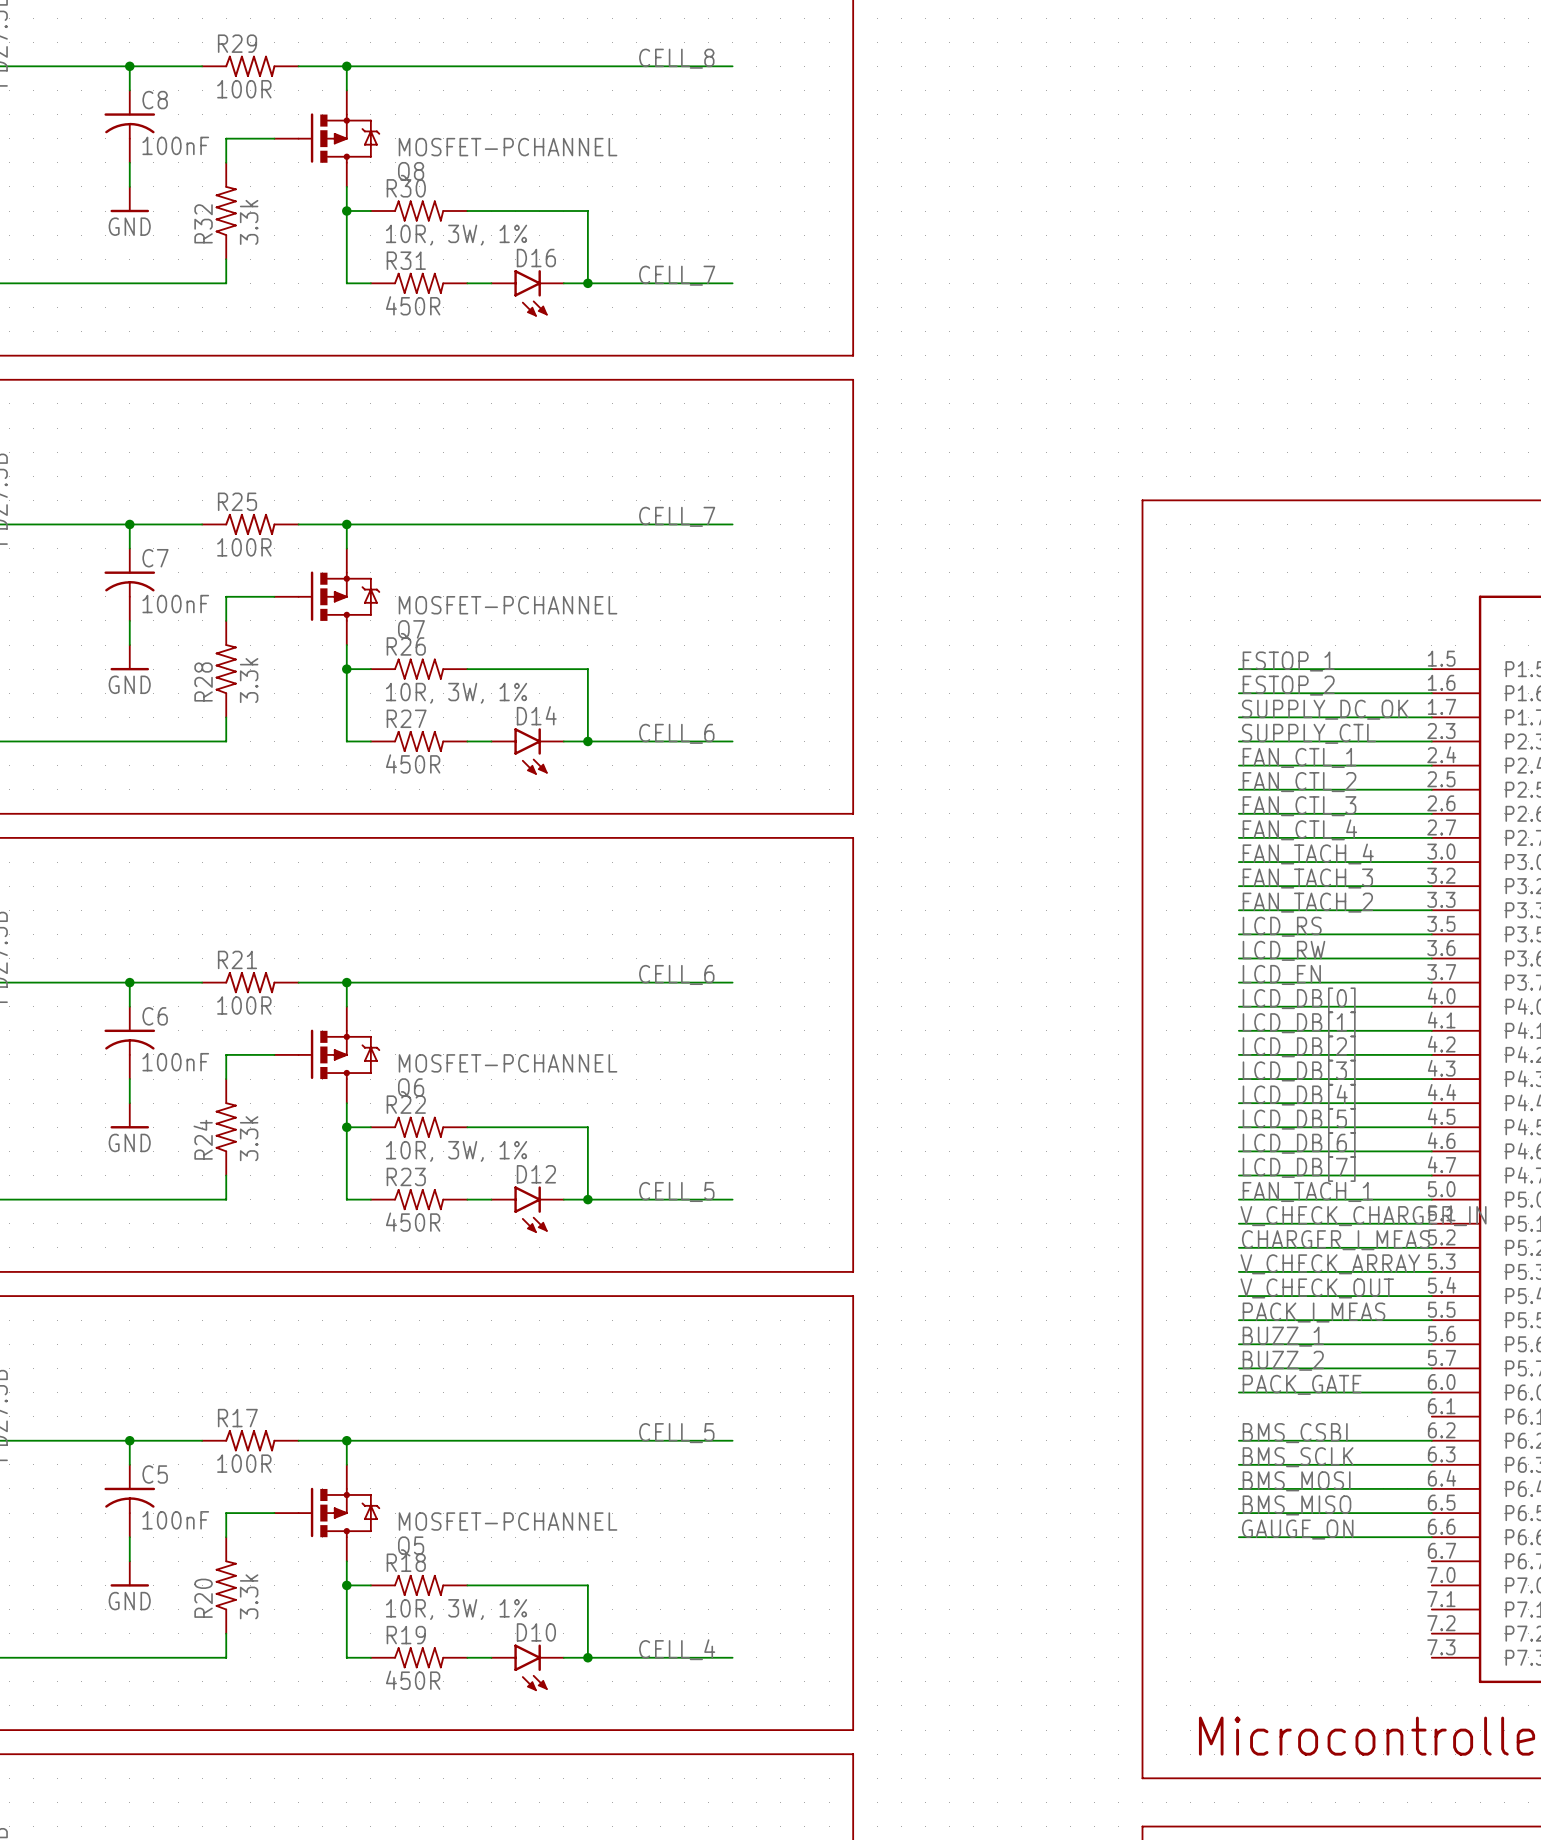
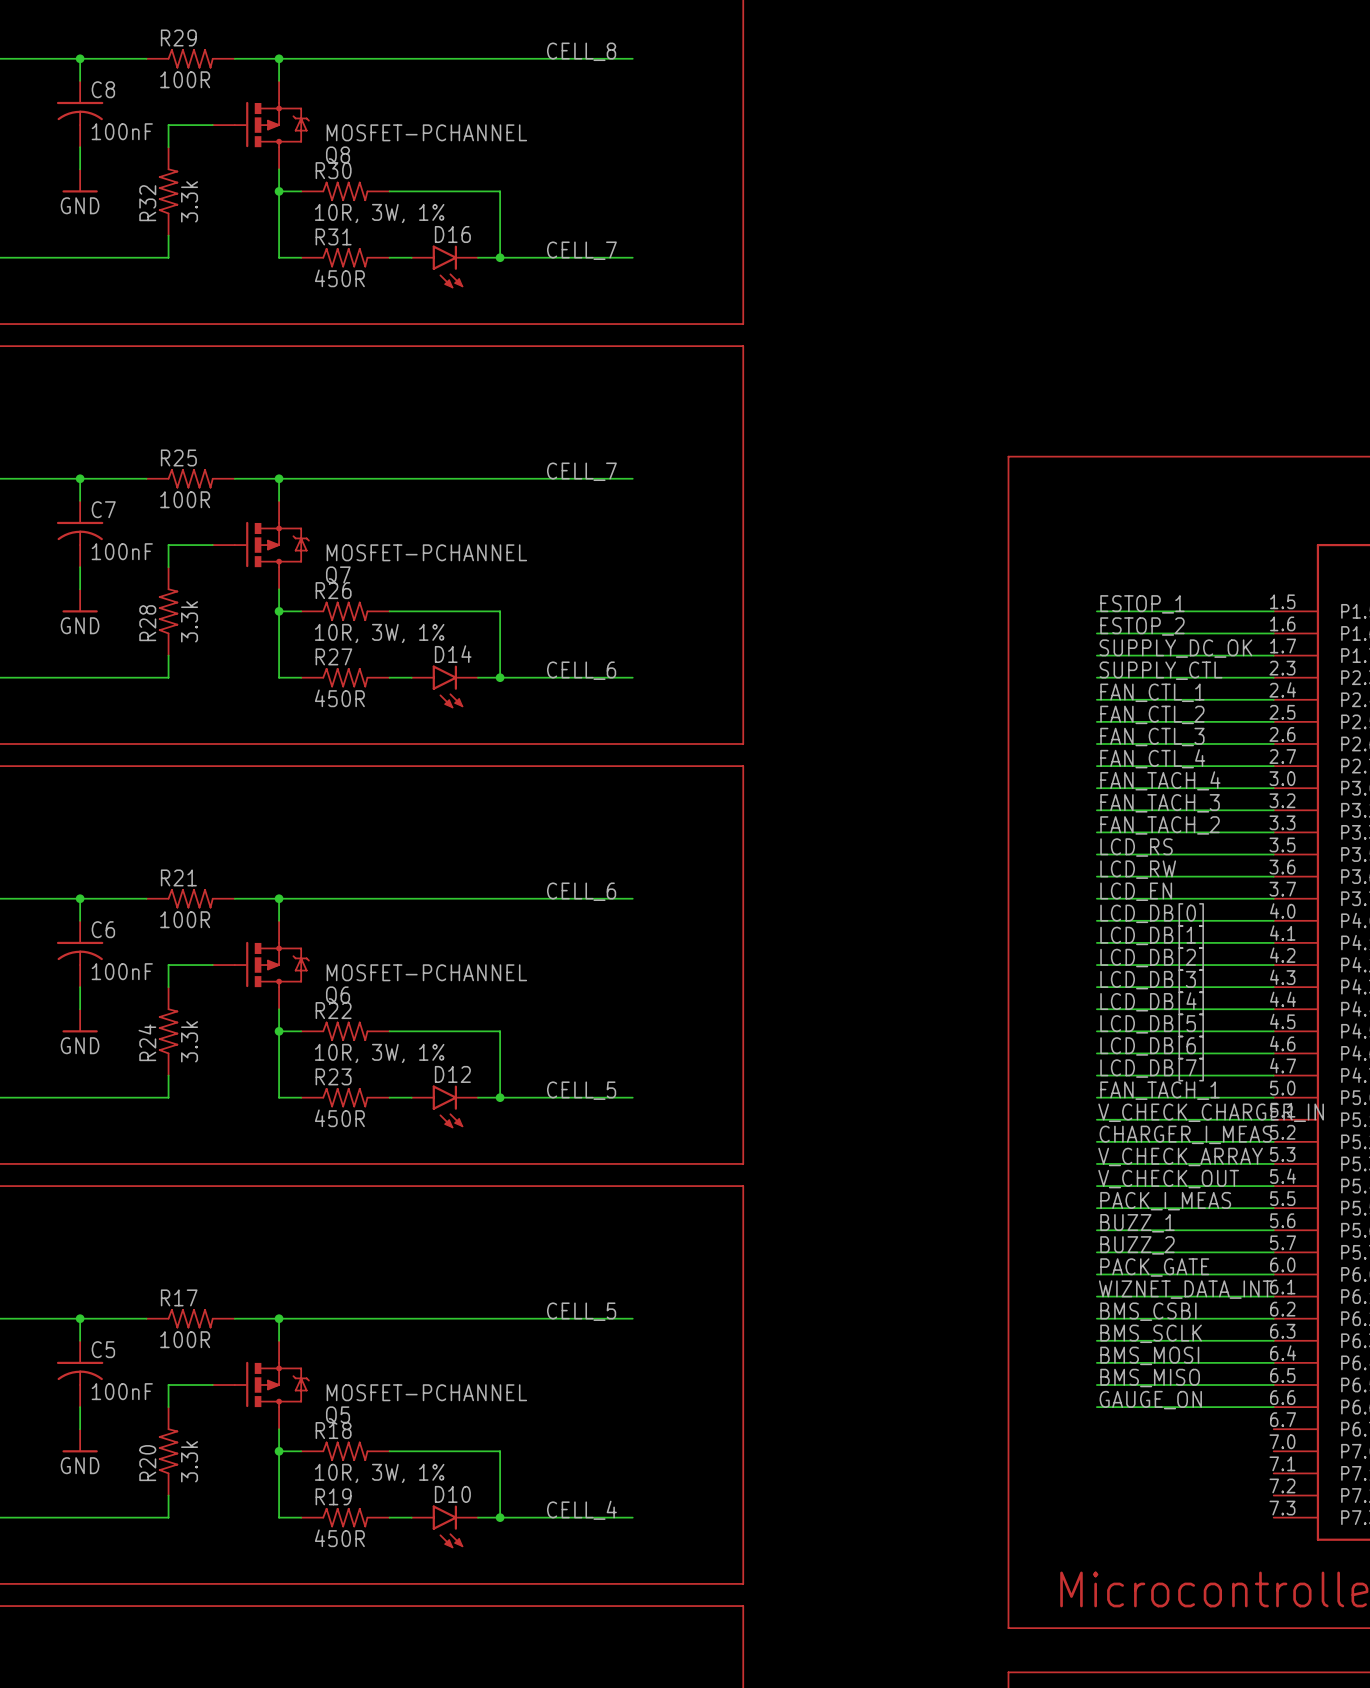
label: none -> WIZNET_DATA_INT (1185, 1289)
wire: none -> (1096, 1296) (1273, 1296)

